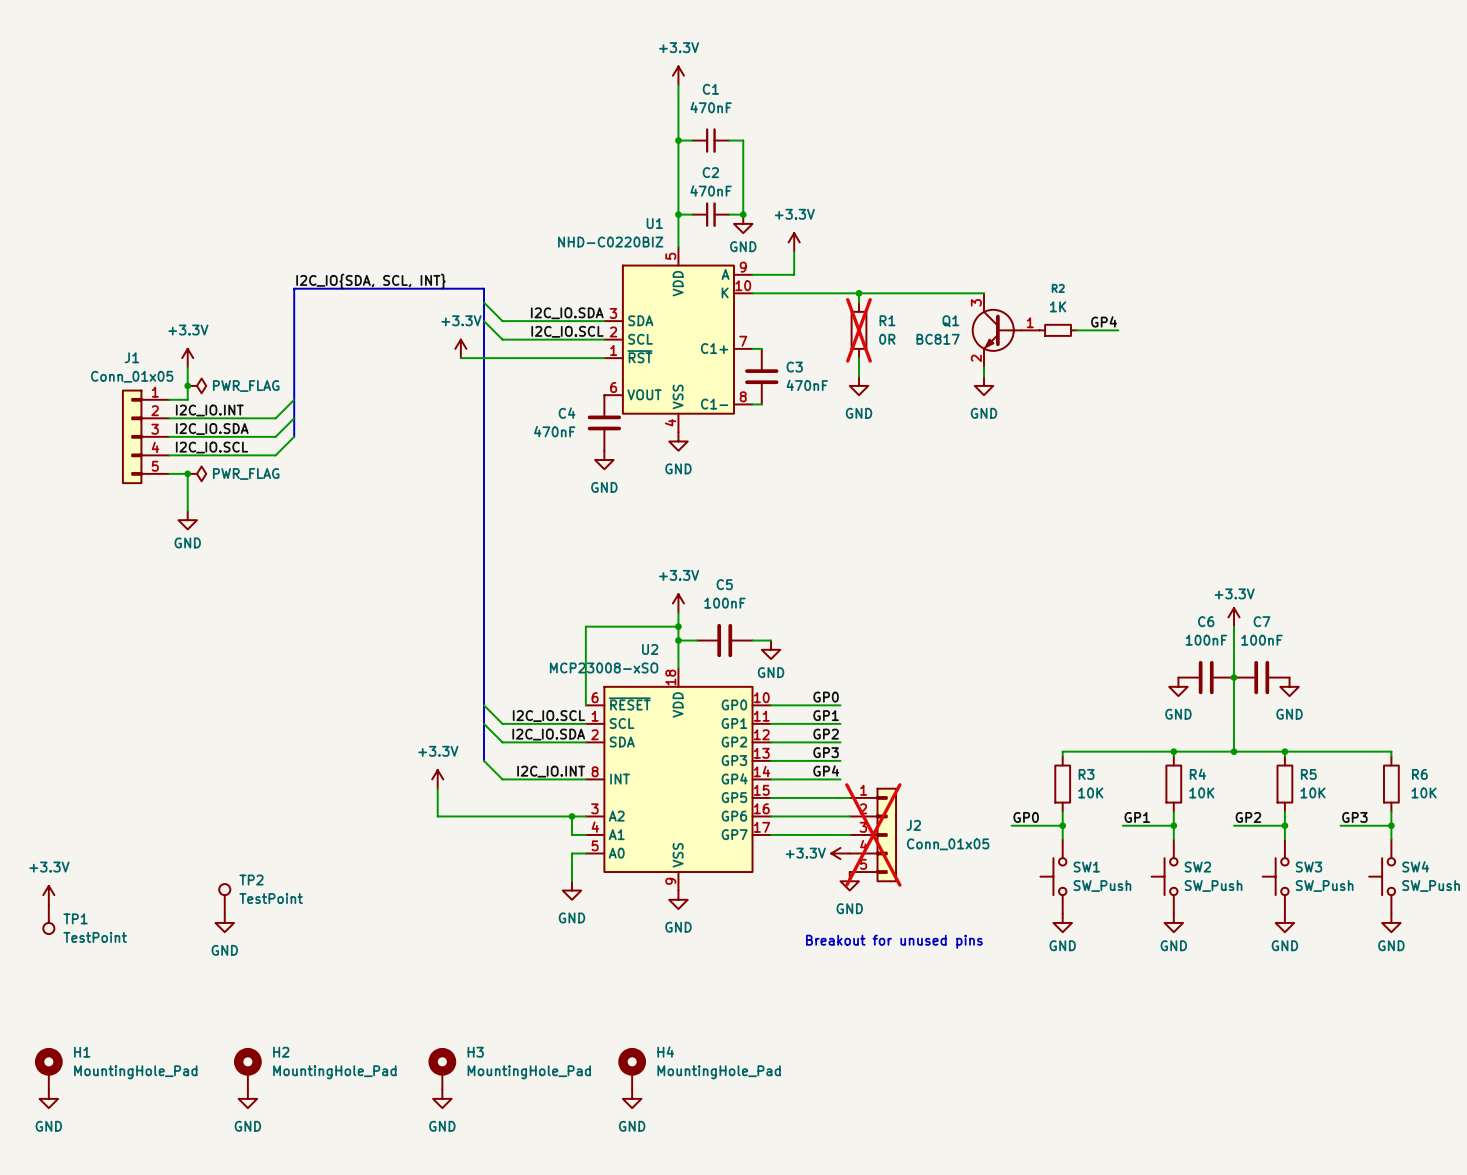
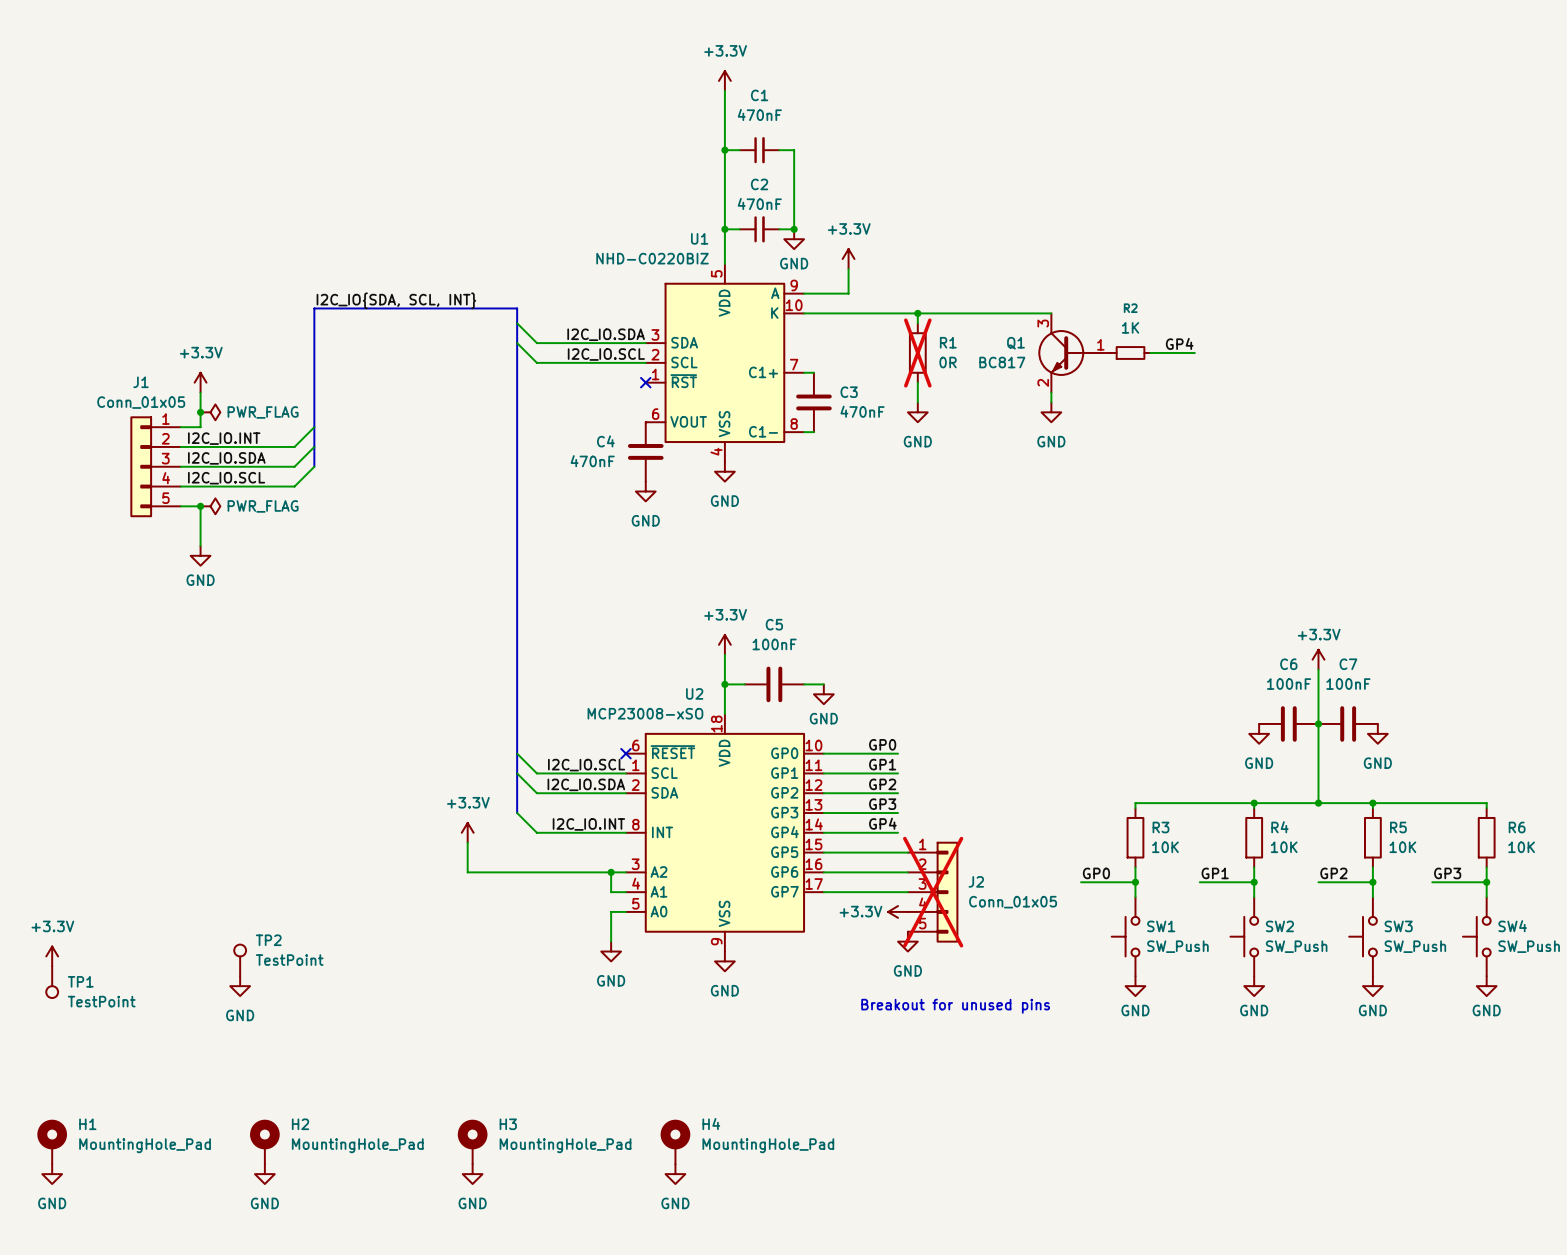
power symbol: +3.3V (460, 348) -> none
wire: (460, 358) (604, 358) -> none
no-connect mark: none -> (645, 382)
wire: (678, 626) (585, 626) (585, 705) -> none
junction: (678, 626) -> none
no-connect mark: none -> (625, 753)

